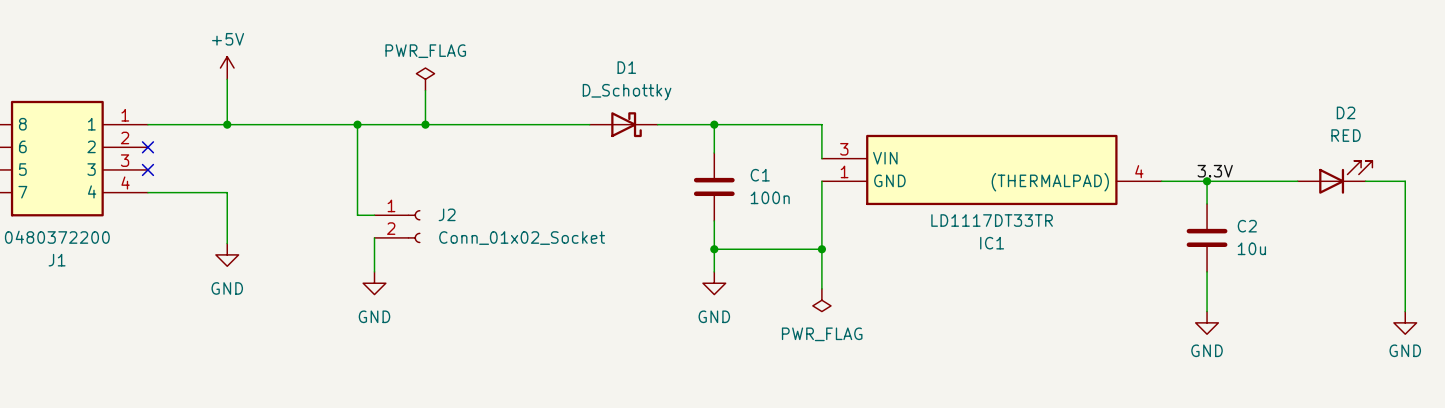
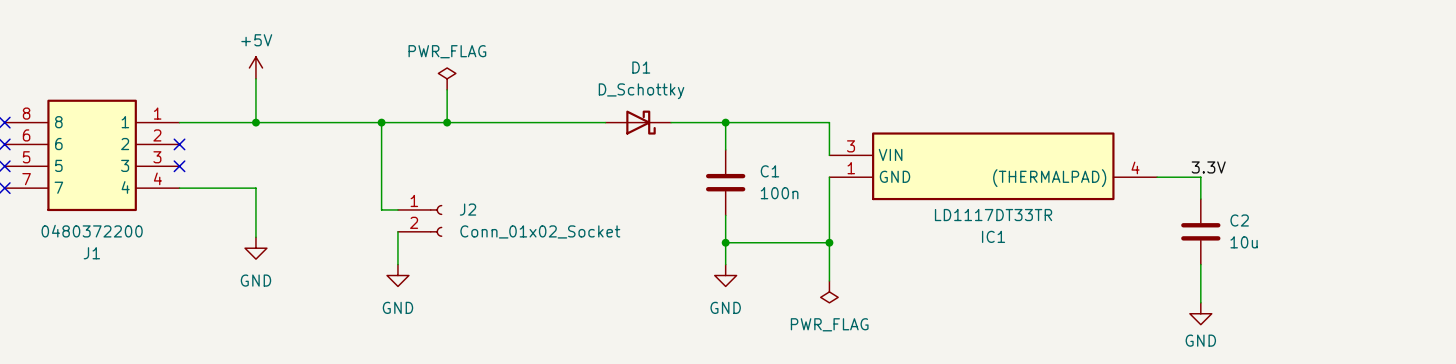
D2: RED (1335, 177) -> none
wire: (1207, 181) (1297, 181) -> none
junction: (1207, 181) -> none
wire: (1365, 181) (1405, 181) (1405, 311) -> none
power symbol: GND (1405, 322) -> none

